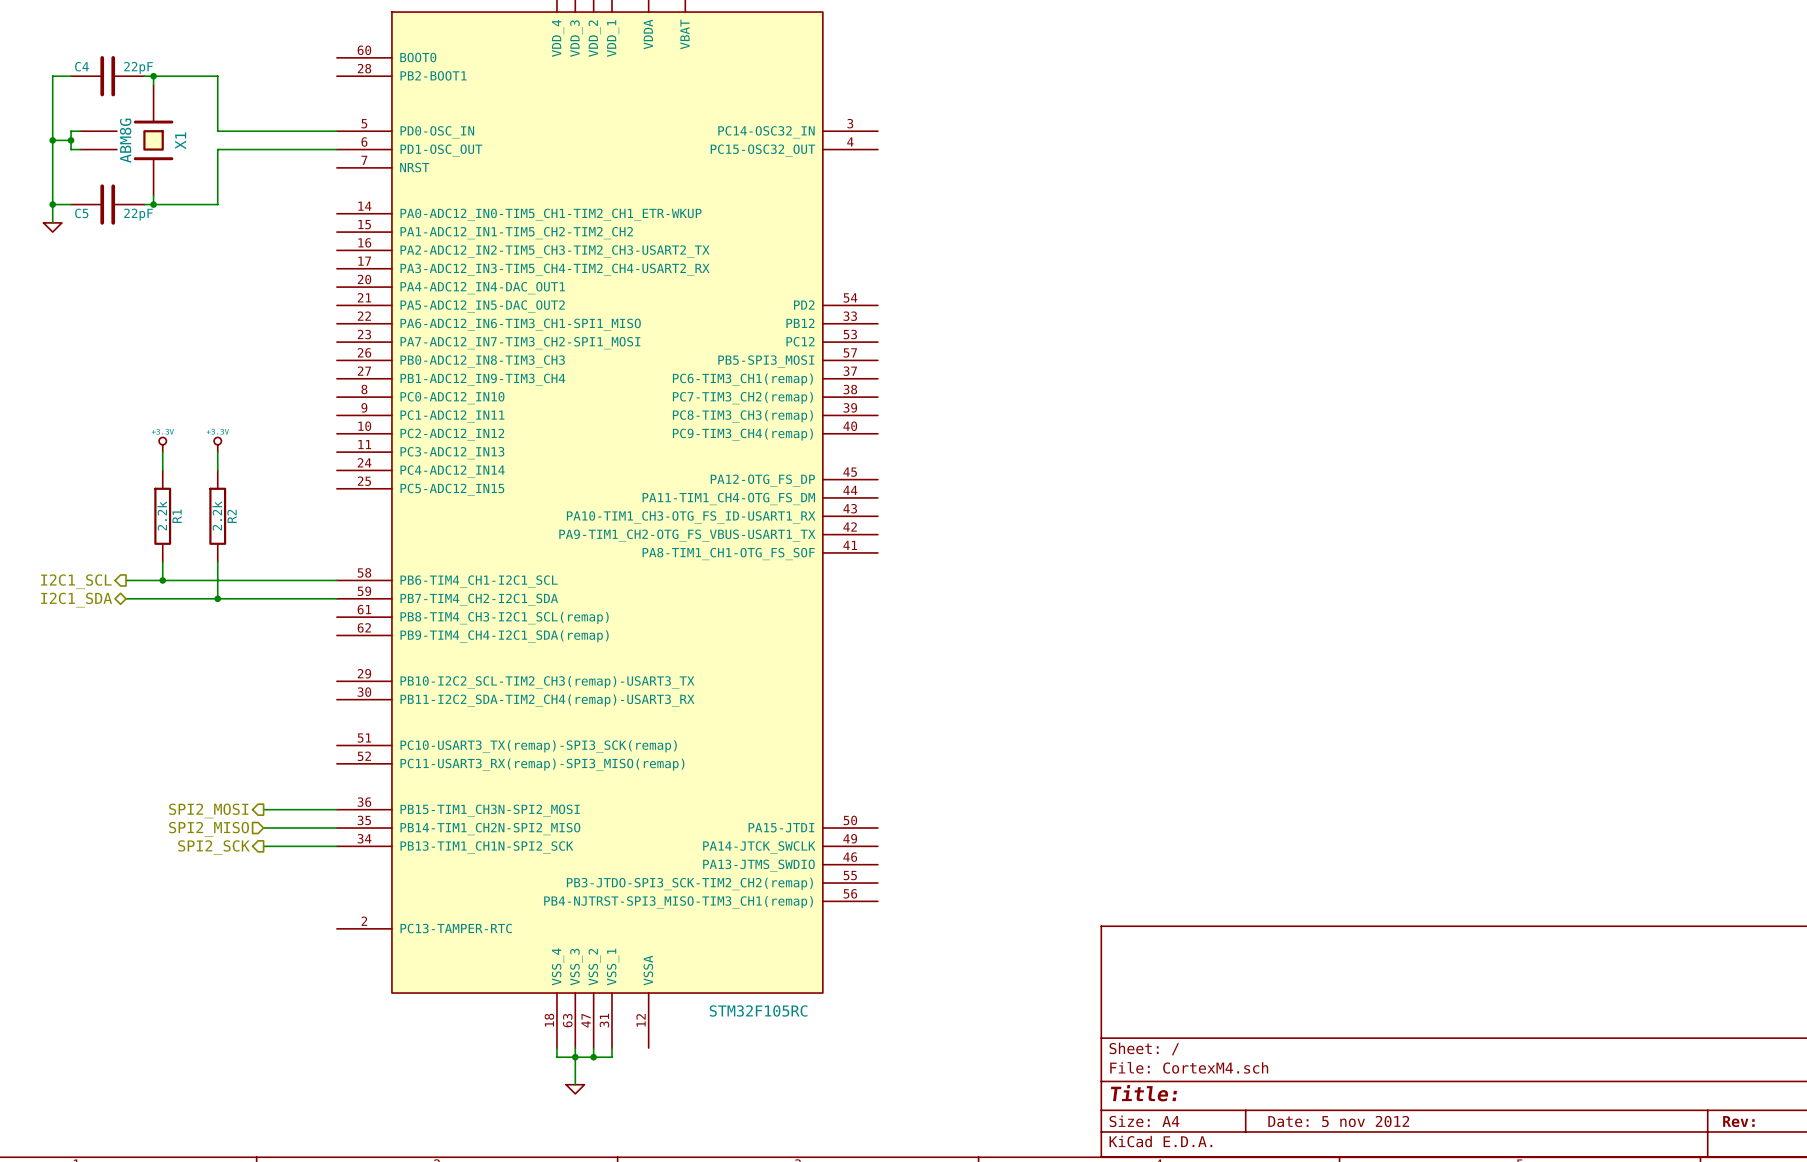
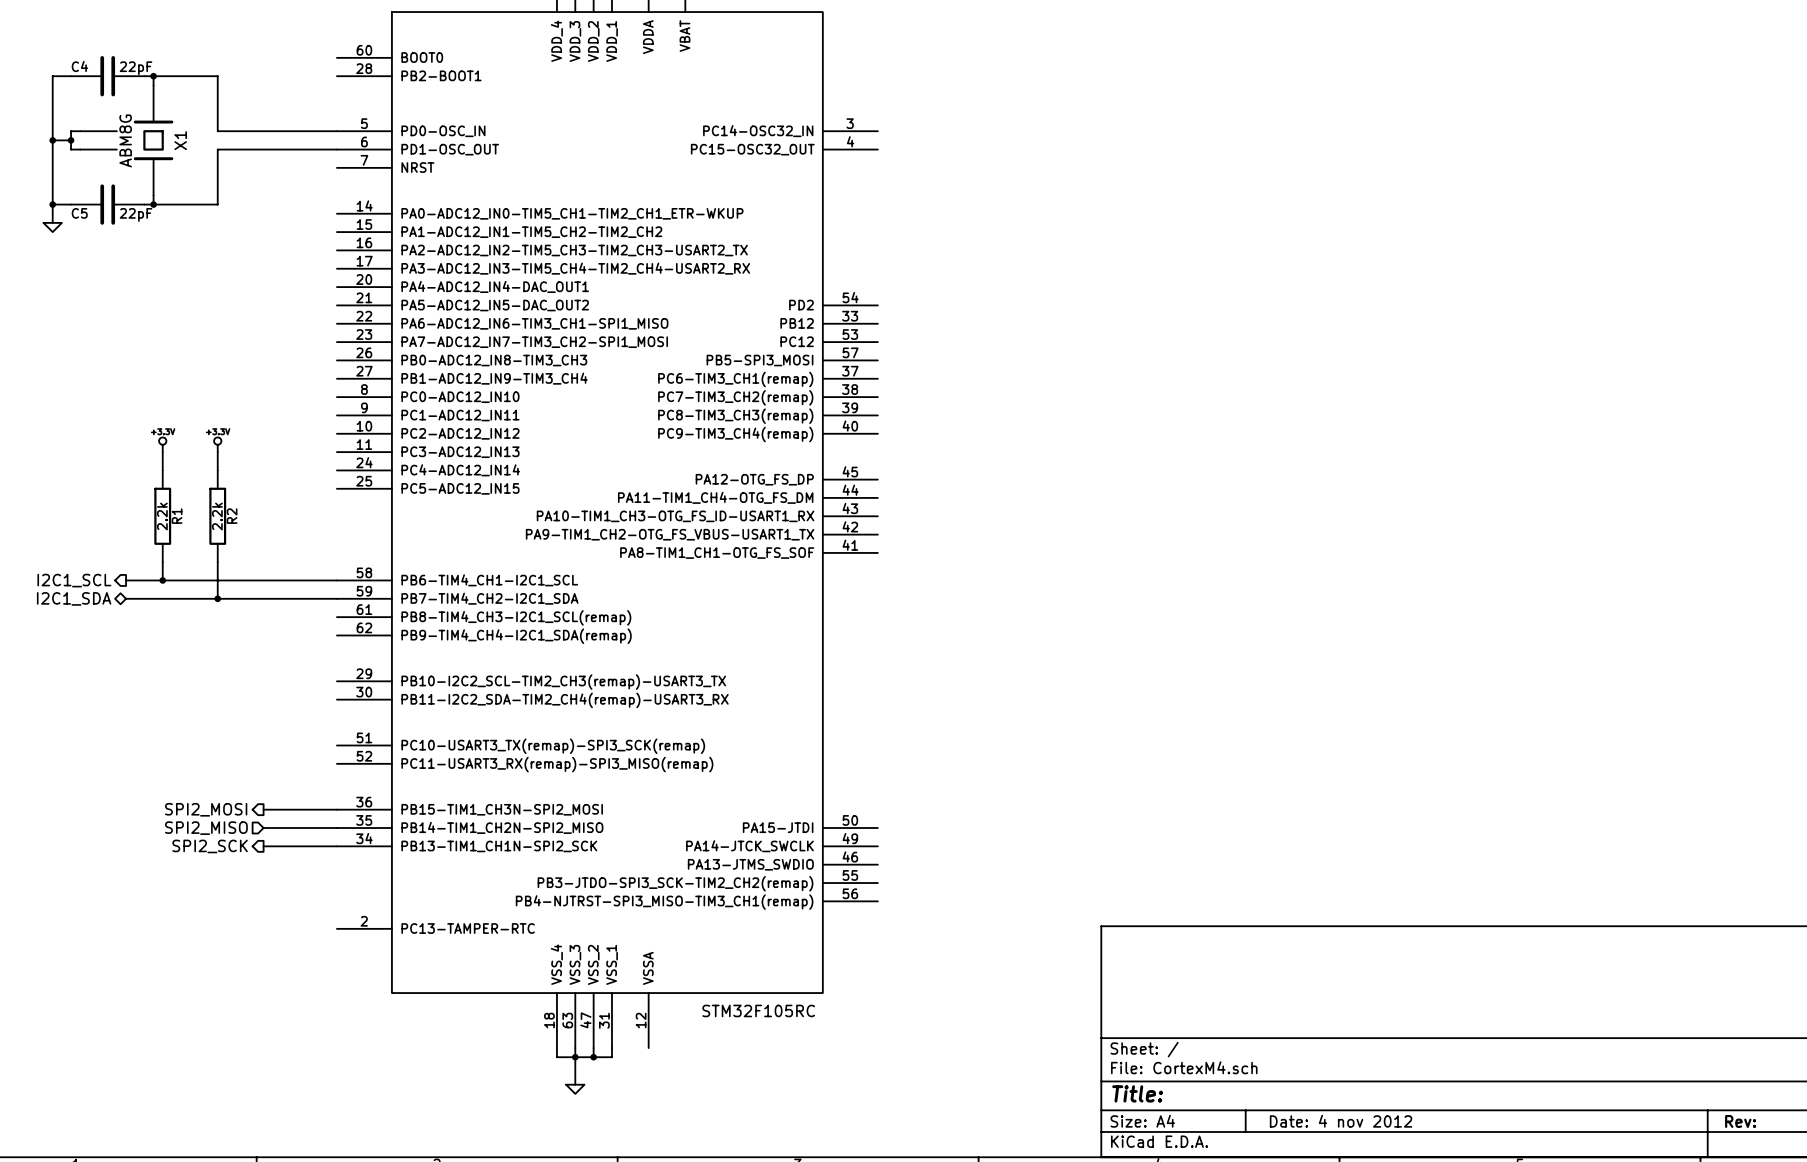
title block: Date: 5 nov 2012 (1338, 1121) -> Date: 4 nov 2012 (1341, 1121)

